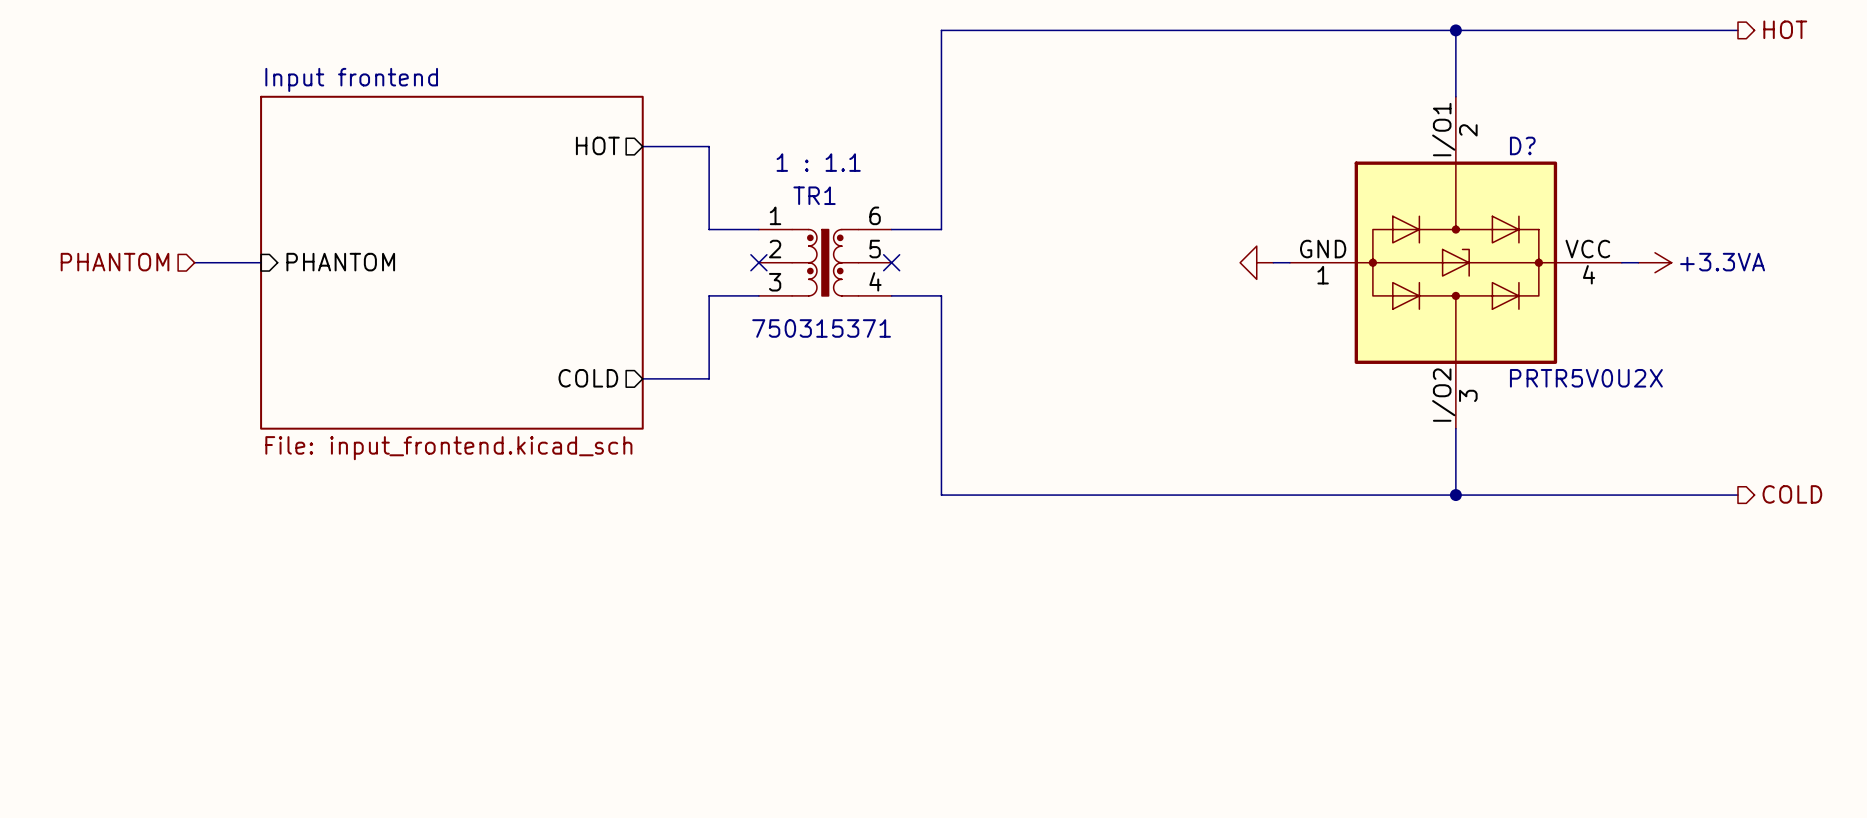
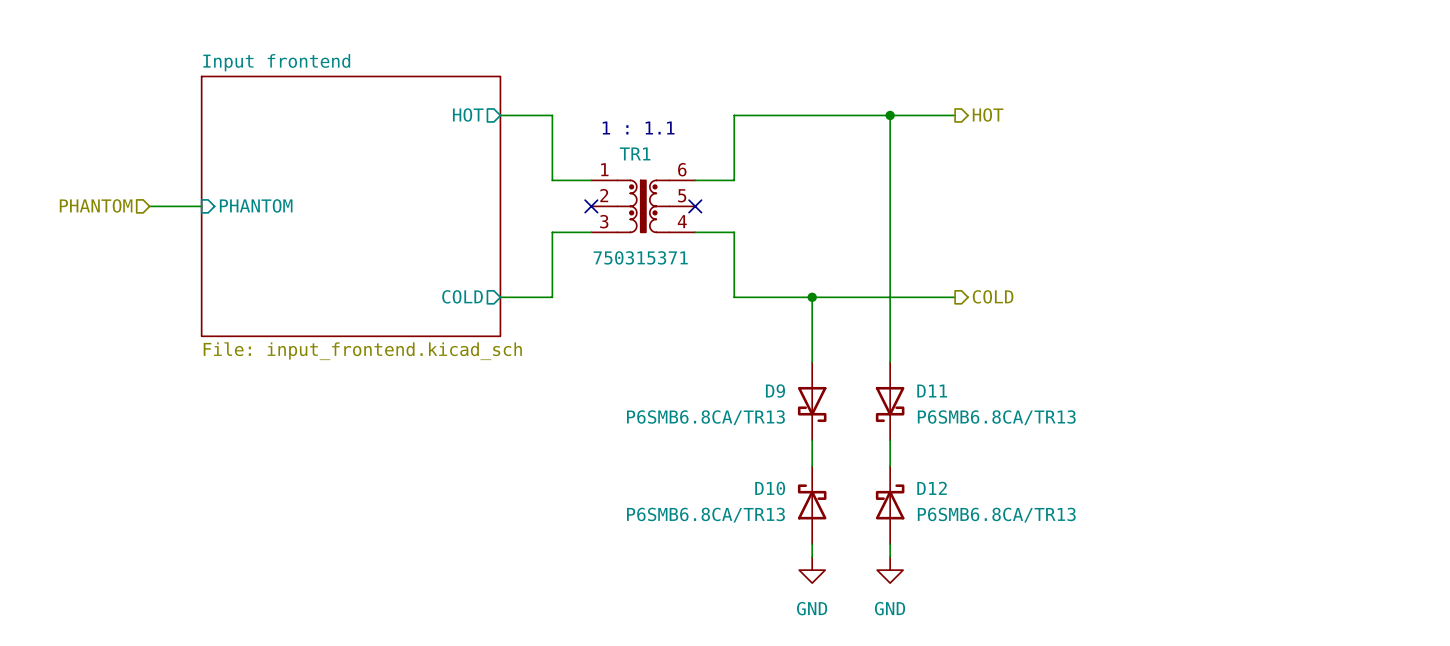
hierarchical label: HOT (1785, 29) -> none
wire: (1455, 30) (1455, 96) -> none
junction: (1455, 30) -> none
wire: (1737, 30) (941, 30) (941, 146) -> (955, 115) (734, 115)
hierarchical label: none -> HOT (988, 114)
wire: none -> (890, 115) (890, 362)
junction: none -> (890, 115)
power symbol: (1256, 262) -> none
wire: (1273, 262) (1289, 262) -> none
D?: PRTR5V0U2X (1455, 262) -> none
wire: (1621, 262) (1638, 262) -> none
power symbol: +3.3VA (1655, 262) -> none
wire: (941, 378) (941, 495) (1737, 495) -> (734, 297) (955, 297)
wire: none -> (812, 297) (812, 362)
junction: none -> (812, 297)
hierarchical label: none -> COLD (993, 296)
wire: (1455, 428) (1455, 495) -> none
hierarchical label: COLD (1792, 494) -> none
junction: (1455, 495) -> none
D9: none -> P6SMB6.8CA/TR13 (812, 401)
D11: none -> P6SMB6.8CA/TR13 (890, 401)
wire: none -> (812, 440) (812, 466)
wire: none -> (890, 440) (890, 466)
D10: none -> P6SMB6.8CA/TR13 (812, 505)
D12: none -> P6SMB6.8CA/TR13 (890, 505)
wire: none -> (812, 544) (812, 557)
wire: none -> (890, 544) (890, 557)
power symbol: none -> GND (812, 570)
power symbol: none -> GND (890, 570)

